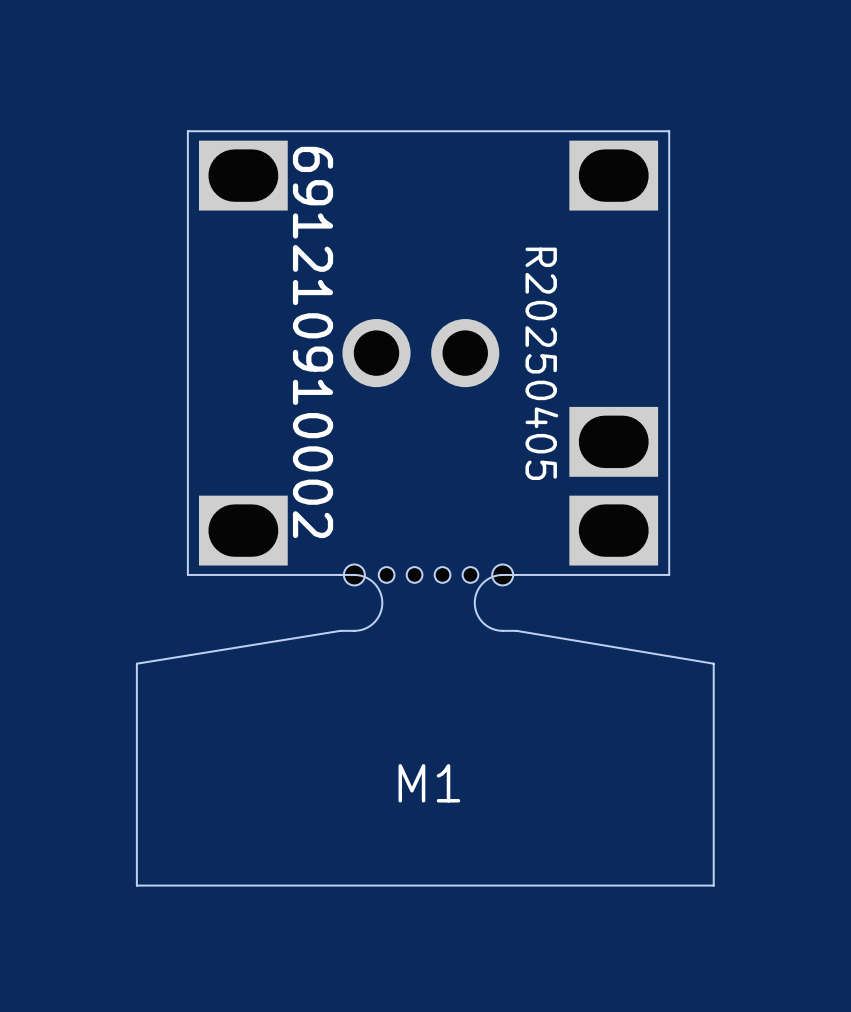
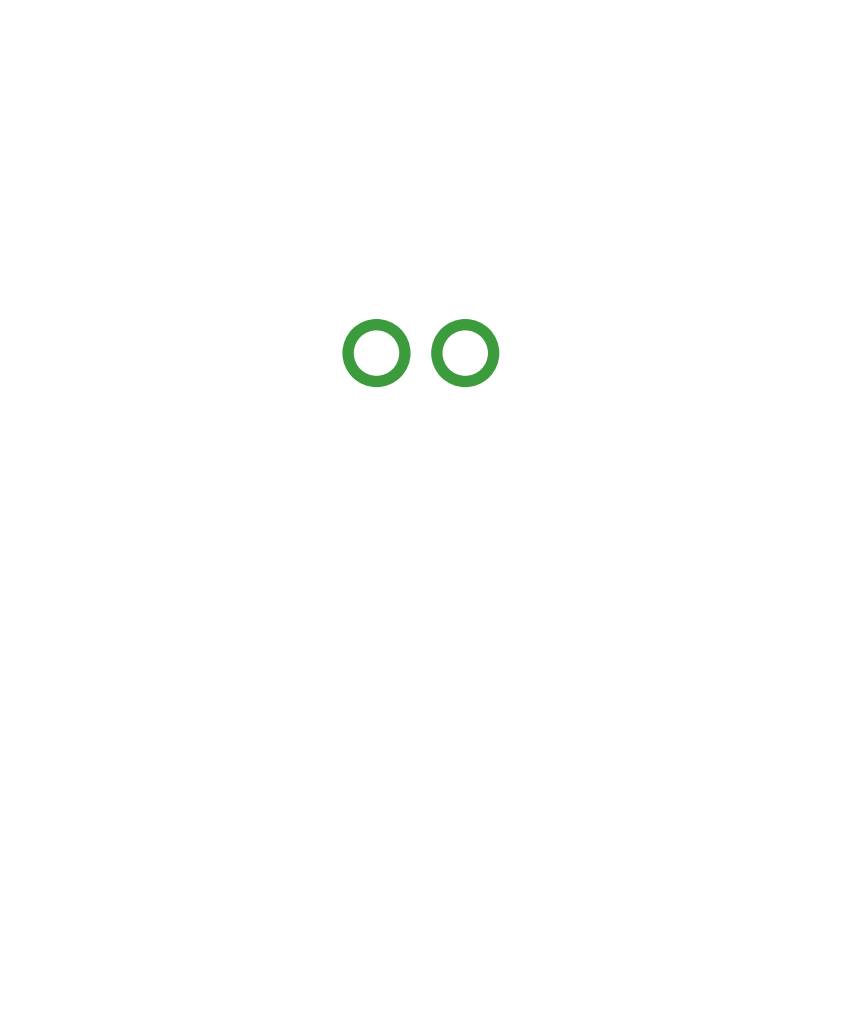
part value: 691210910002 (313, 342) -> none
text: R20250405 (541, 363) -> none
M1: (428, 381) -> none
board edge: (516, 630) (713, 663) (713, 885) (136, 885) (136, 663) (340, 630) -> none

